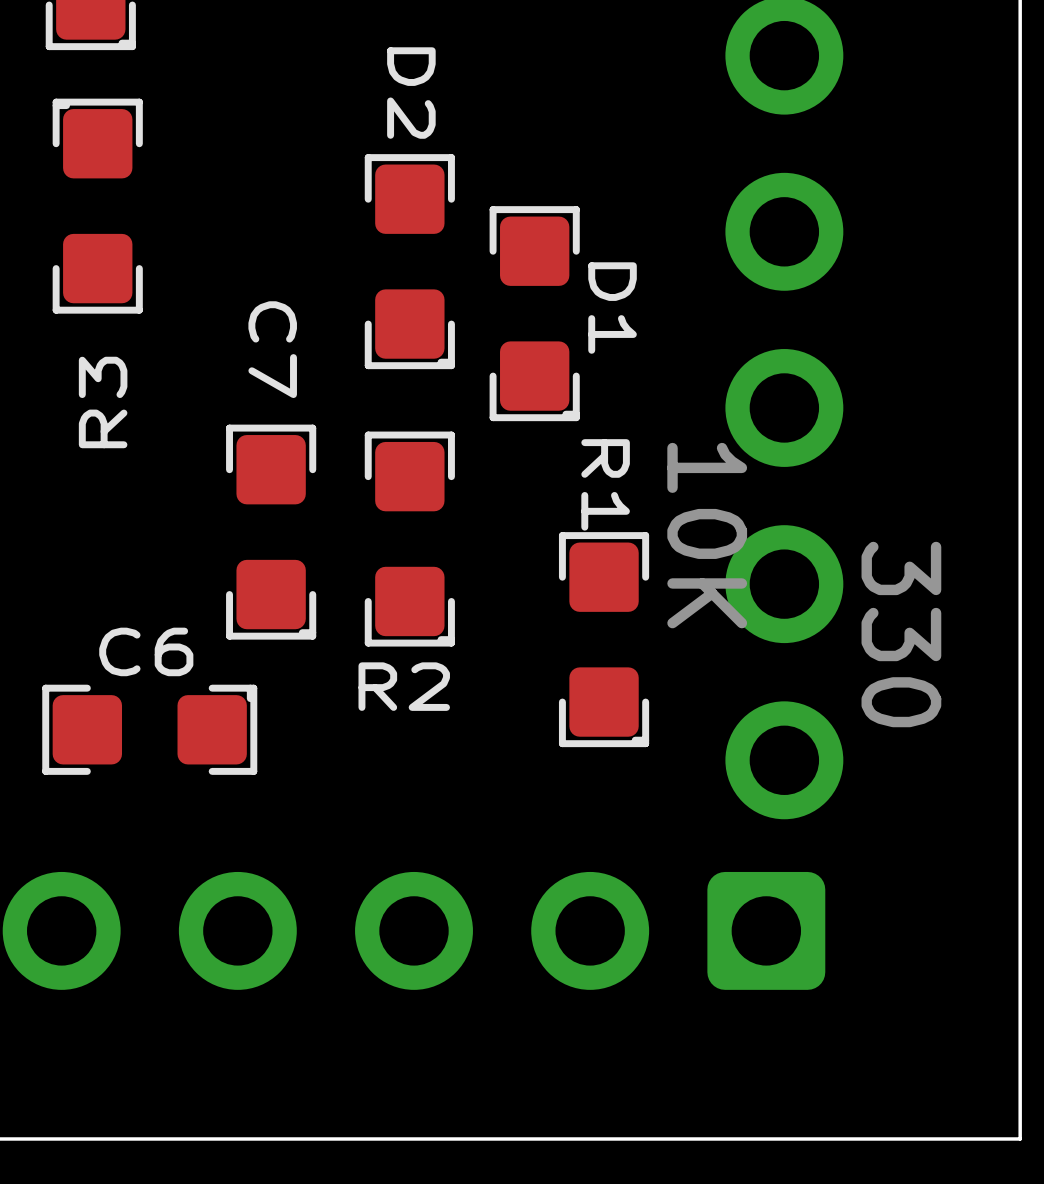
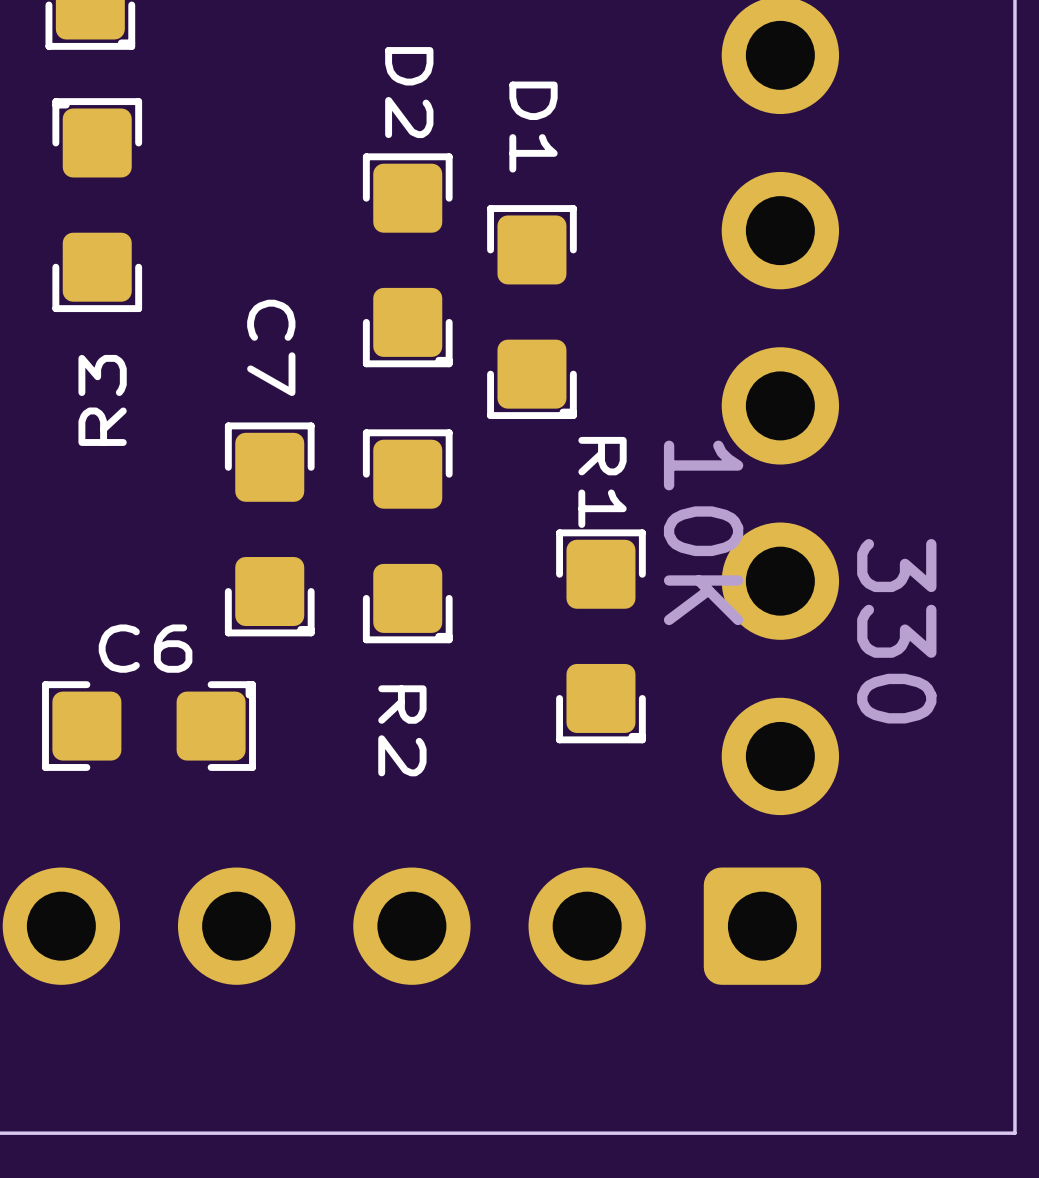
D1 name position: D1 (612, 308) -> D1 (533, 127)
R2 name rotation: 0° (404, 686) -> 90° clockwise (402, 730)

